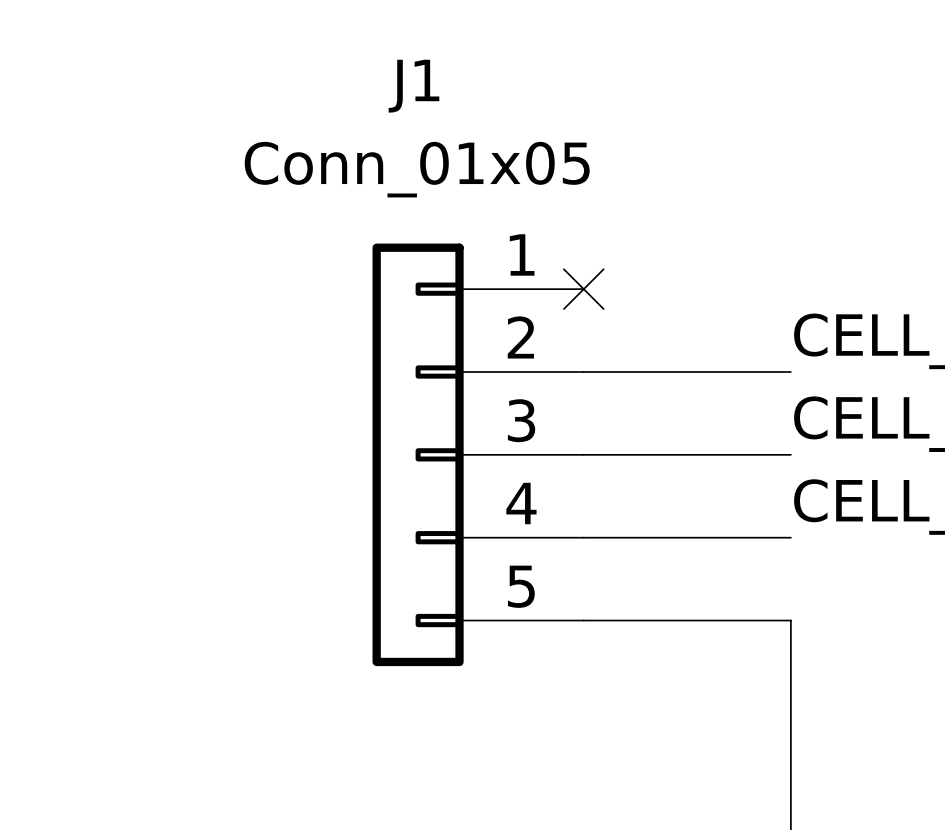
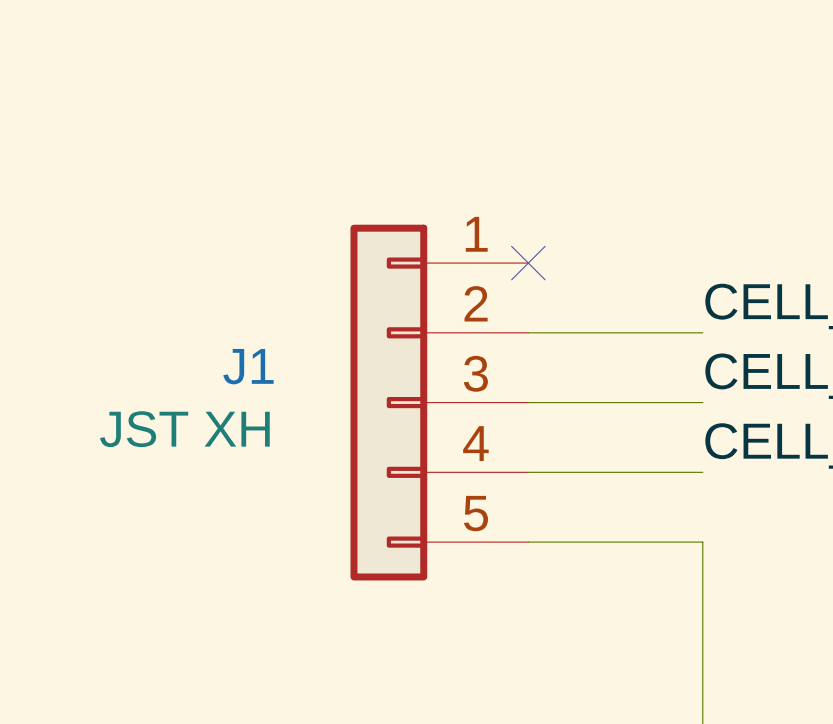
J1 name position: J1 (414, 86) -> J1 (248, 366)
J1 value: Conn_01x05 (417, 169) -> JST XH (184, 429)

